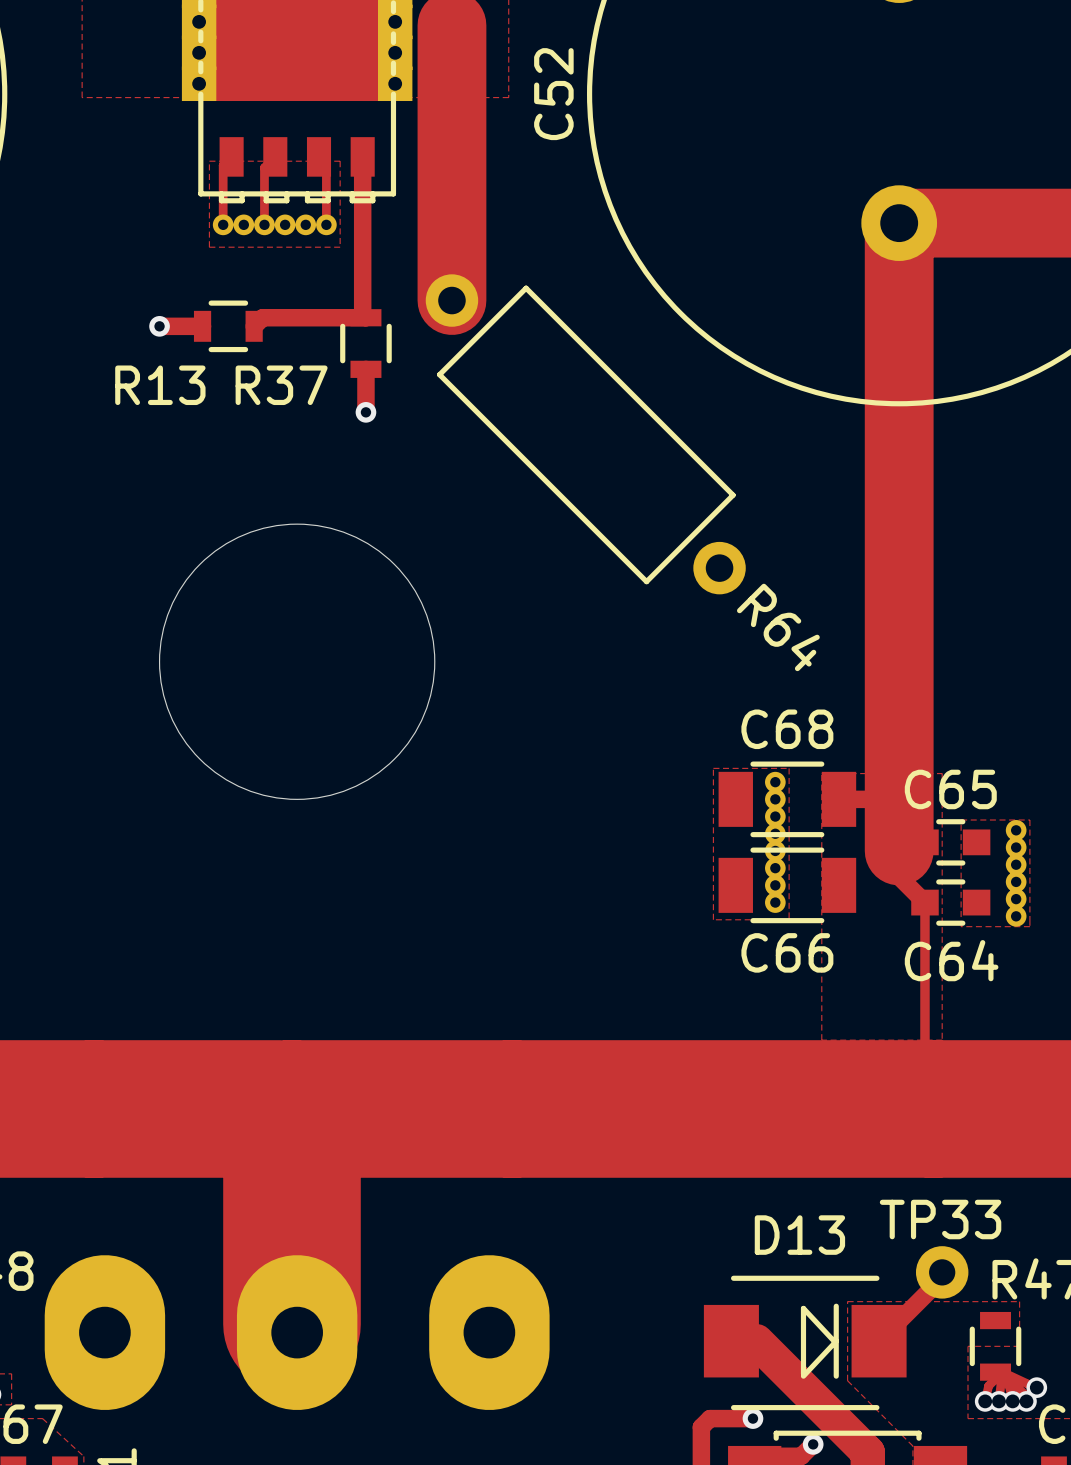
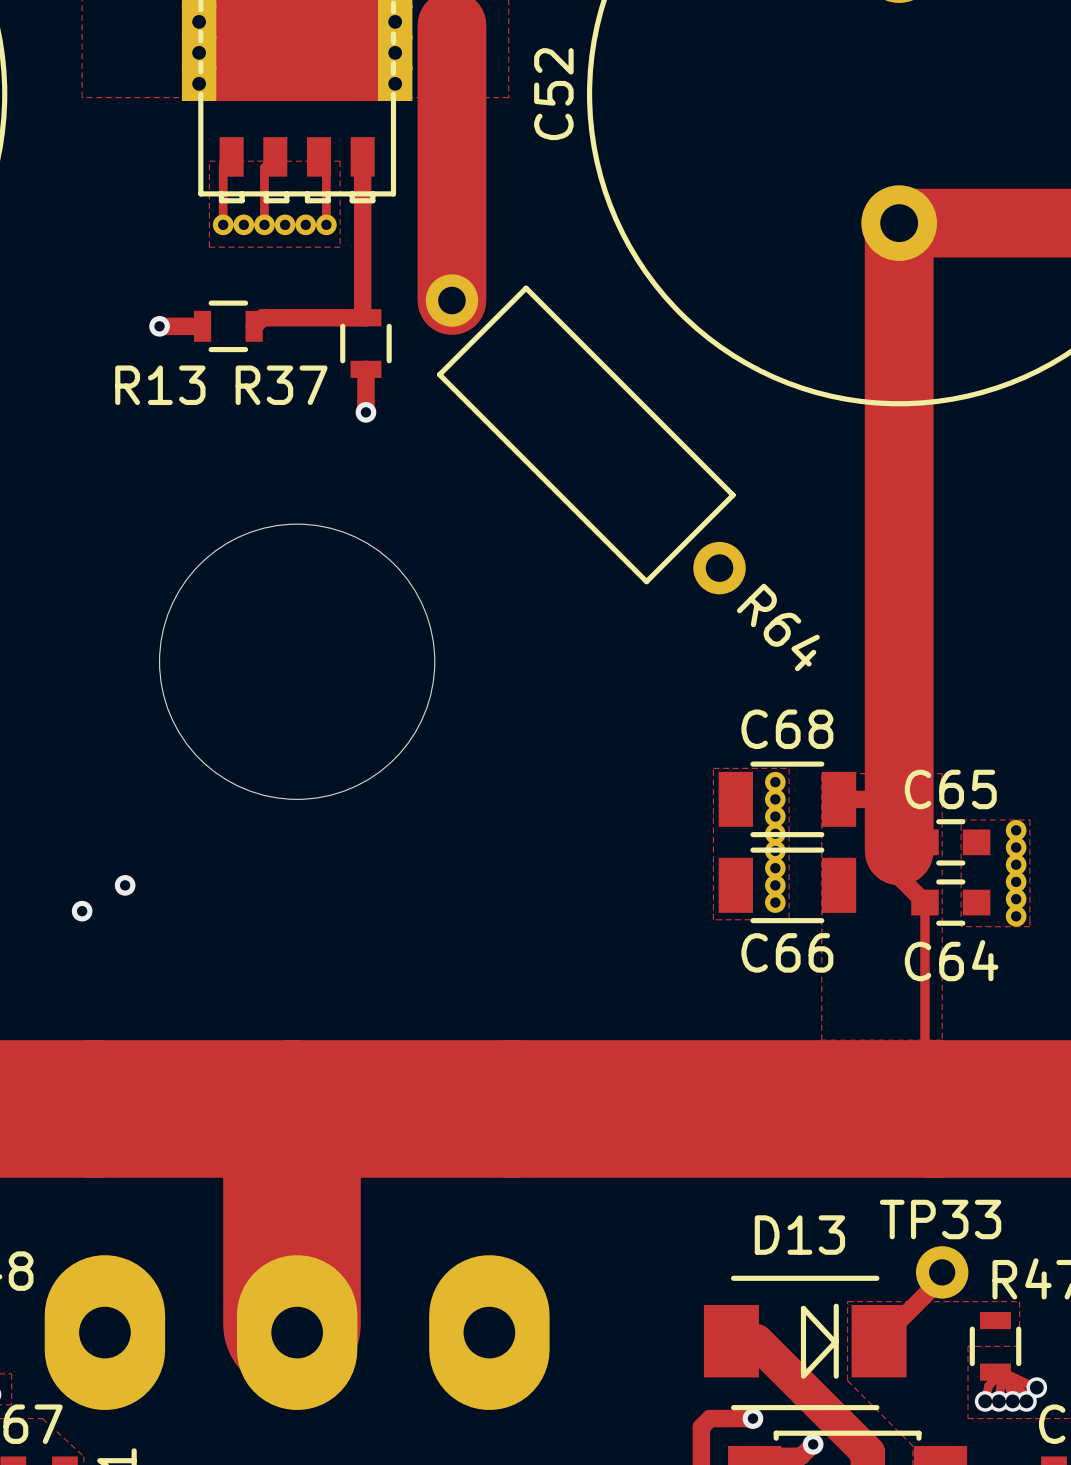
via: none -> (125, 885)
via: none -> (82, 911)

